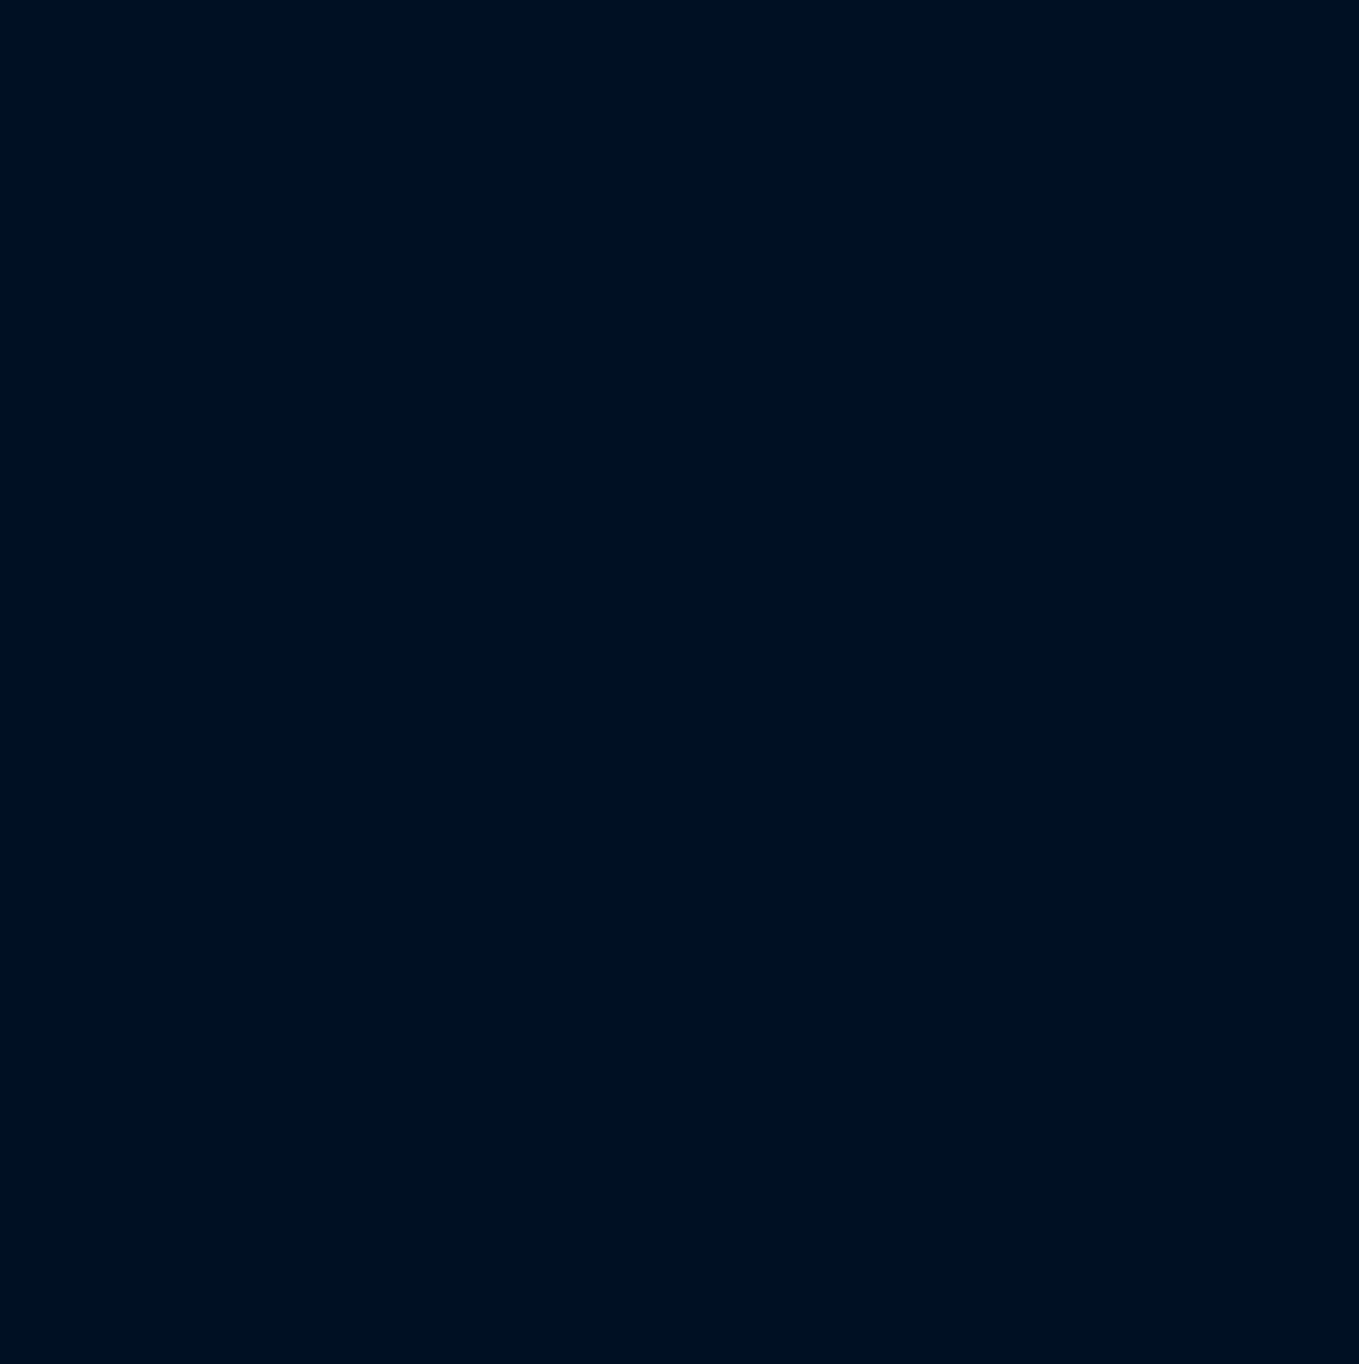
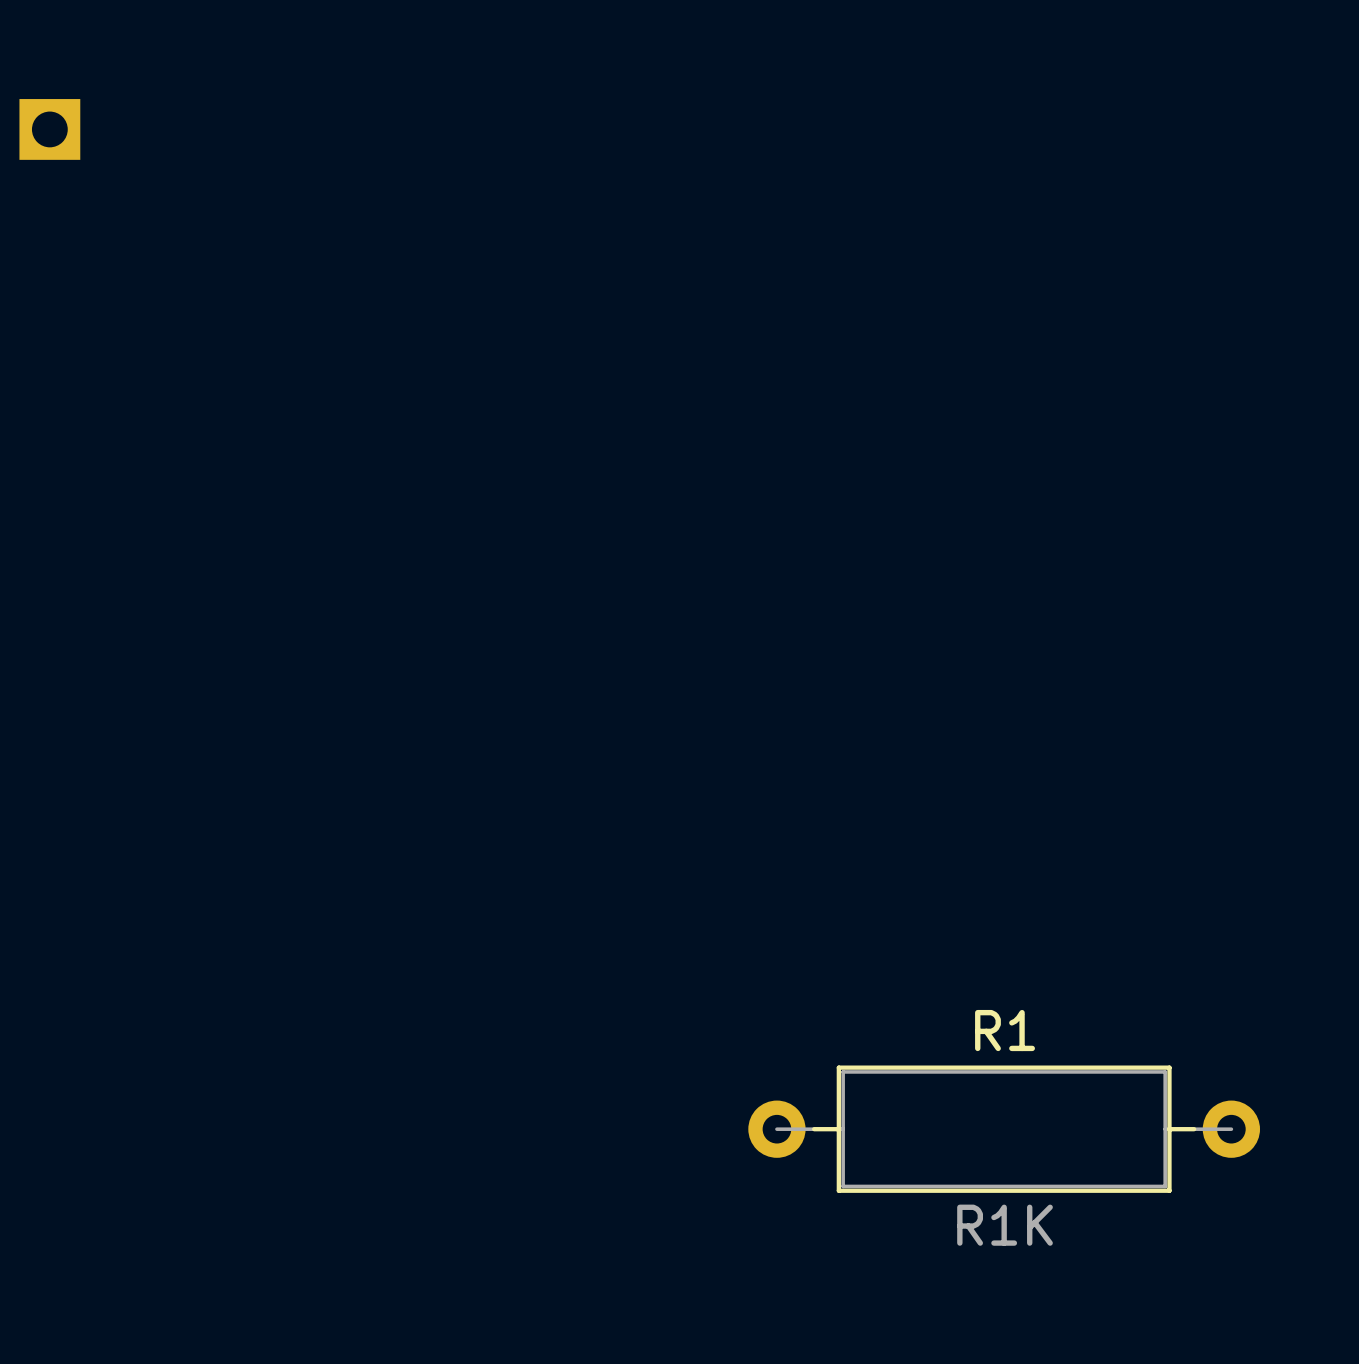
part: none -> (49, 129)
R1: none -> R1K (1004, 1129)

